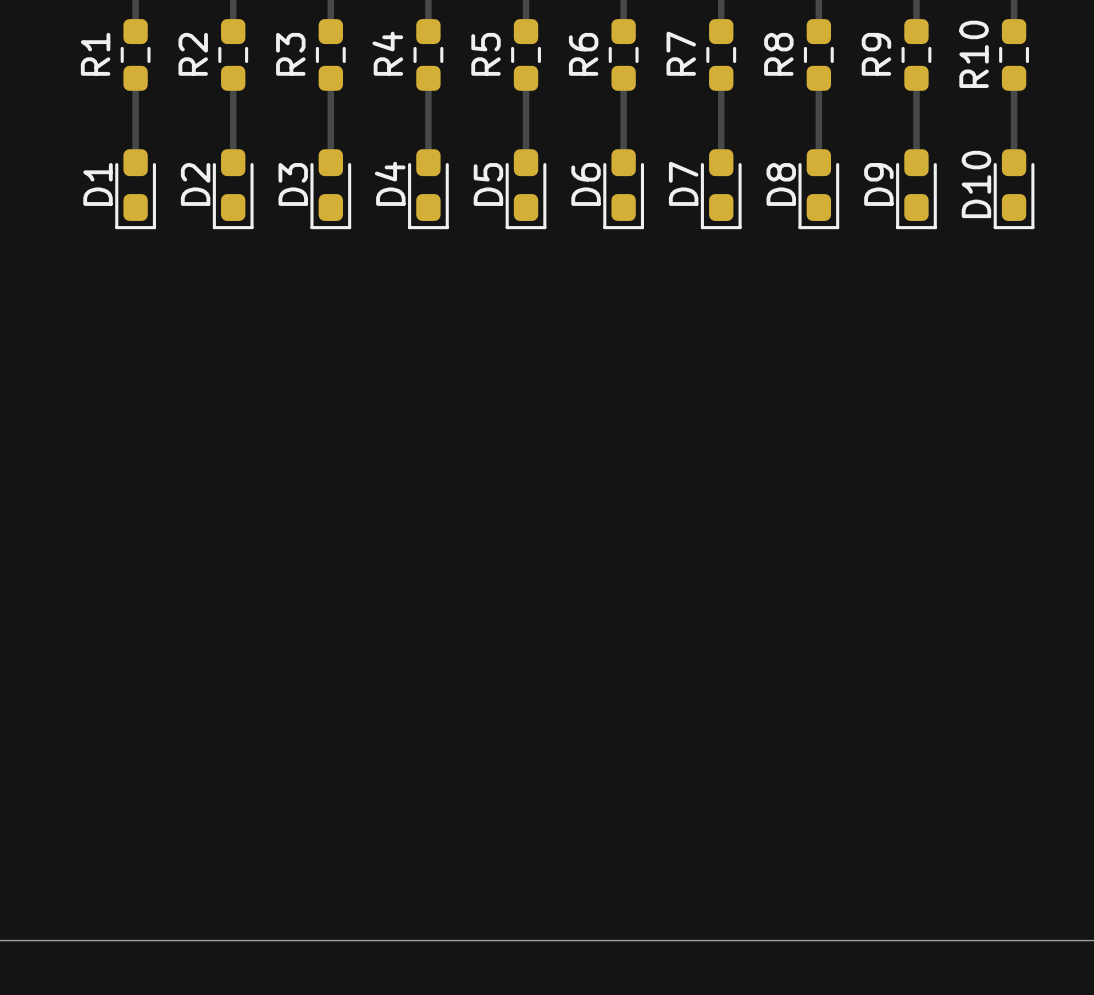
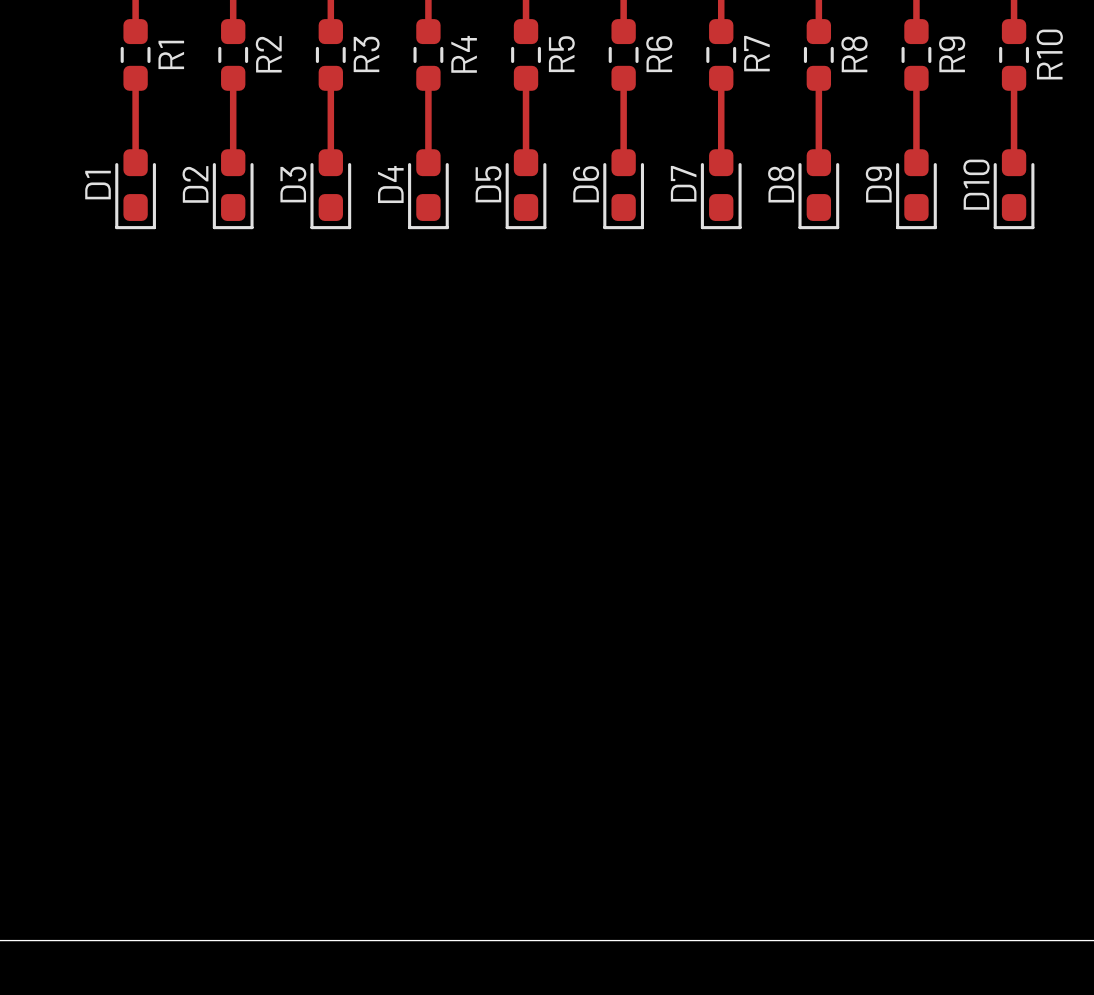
R4 name position: R4 (387, 53) -> R4 (464, 54)
R7 name position: R7 (681, 53) -> R7 (756, 53)
R1 name position: R1 (95, 54) -> R1 (171, 54)
R2 name position: R2 (193, 54) -> R2 (268, 54)
R3 name position: R3 (290, 54) -> R3 (366, 54)
R5 name position: R5 (486, 54) -> R5 (561, 54)
R6 name position: R6 (583, 54) -> R6 (659, 54)
R8 name position: R8 (778, 54) -> R8 (854, 54)
R9 name position: R9 (876, 54) -> R9 (952, 54)
R10 name position: R10 (974, 54) -> R10 (1049, 54)

